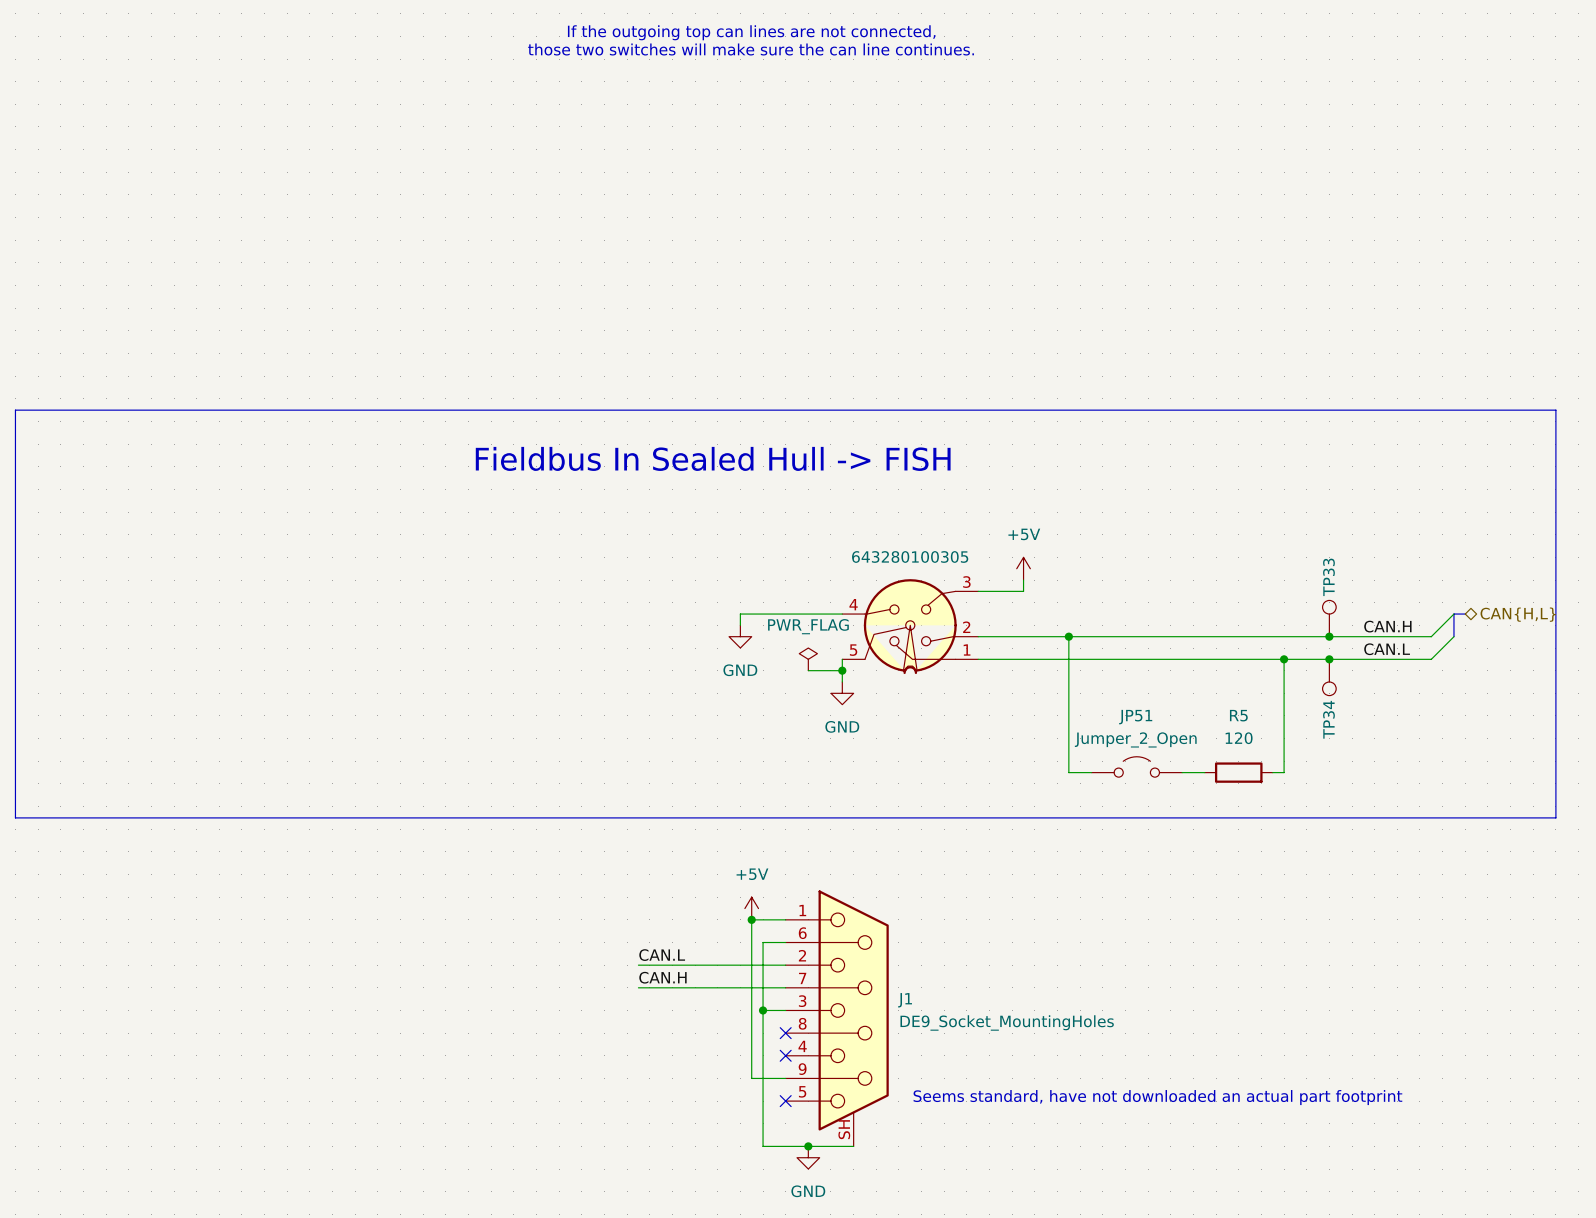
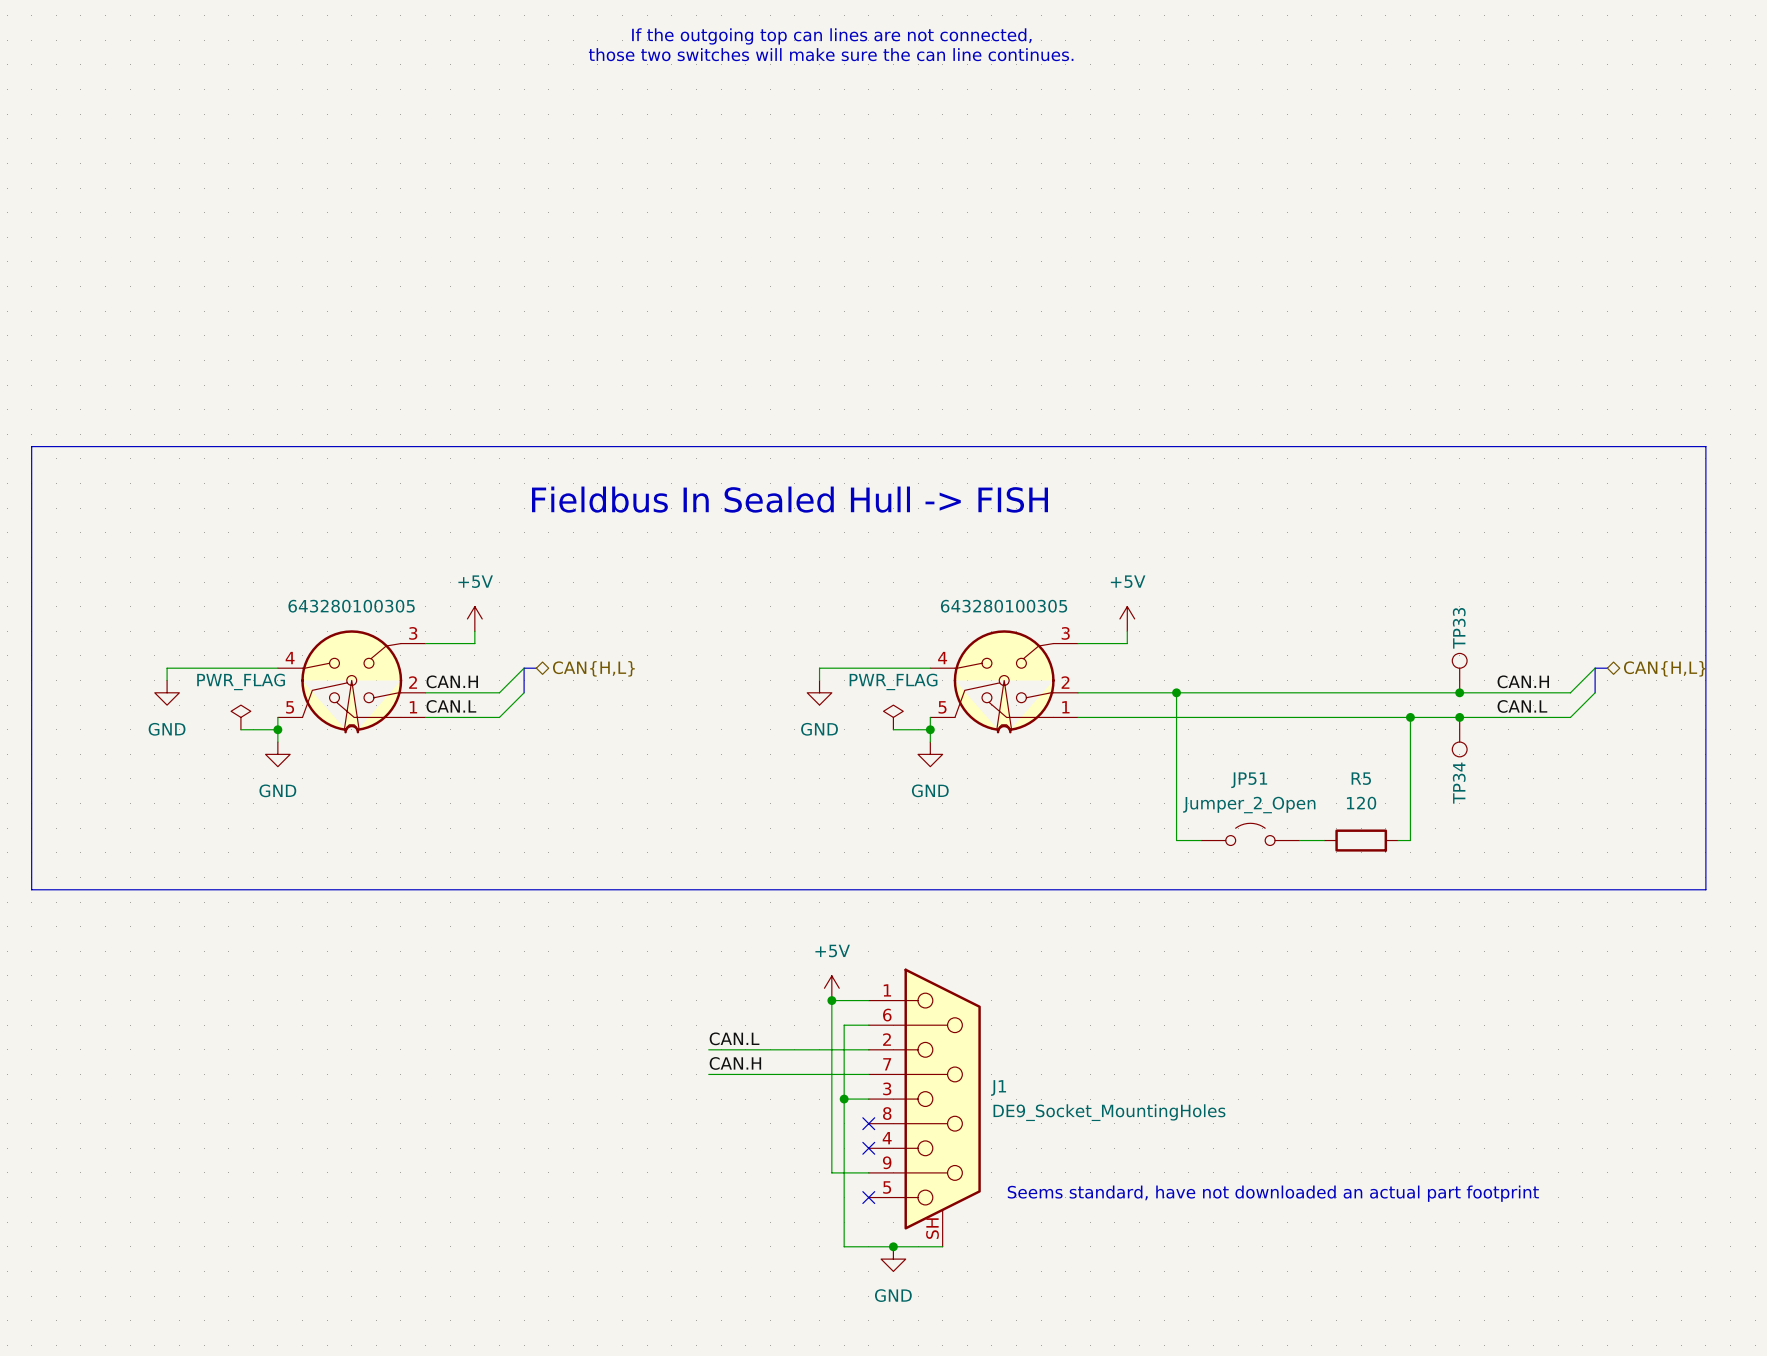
power symbol: none -> +5V (474, 618)
wire: none -> (474, 631) (474, 643) (425, 643)
wire: none -> (277, 668) (167, 668) (167, 680)
wire: none -> (524, 668) (499, 692) (425, 692)
bus: none -> (536, 668) (524, 668) (524, 692)
hierarchical label: none -> CAN{H,L} (593, 668)
part: none -> 643280100305 (351, 681)
label: none -> CAN.H (452, 681)
power symbol: none -> GND (167, 692)
wire: none -> (524, 692) (499, 717) (425, 717)
label: none -> CAN.L (451, 706)
power symbol: none -> PWR_FLAG (240, 717)
wire: none -> (277, 717) (277, 742)
wire: none -> (240, 729) (277, 729)
junction: none -> (277, 729)
power symbol: none -> GND (277, 754)

